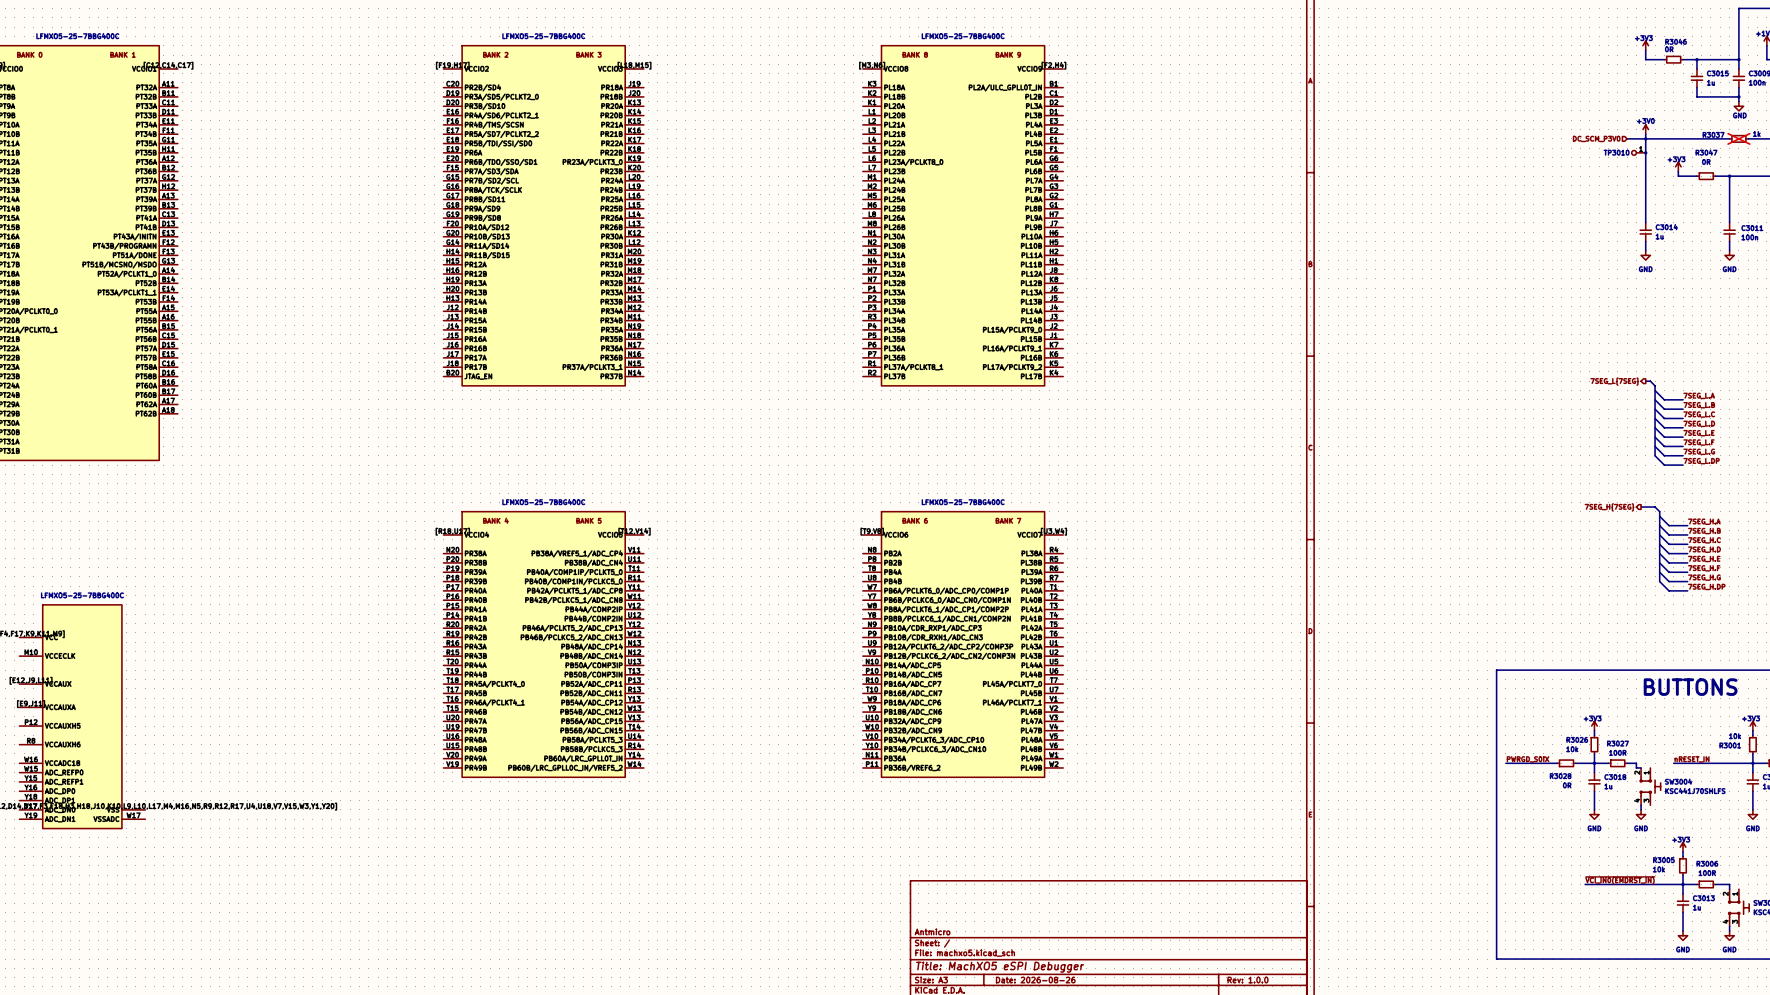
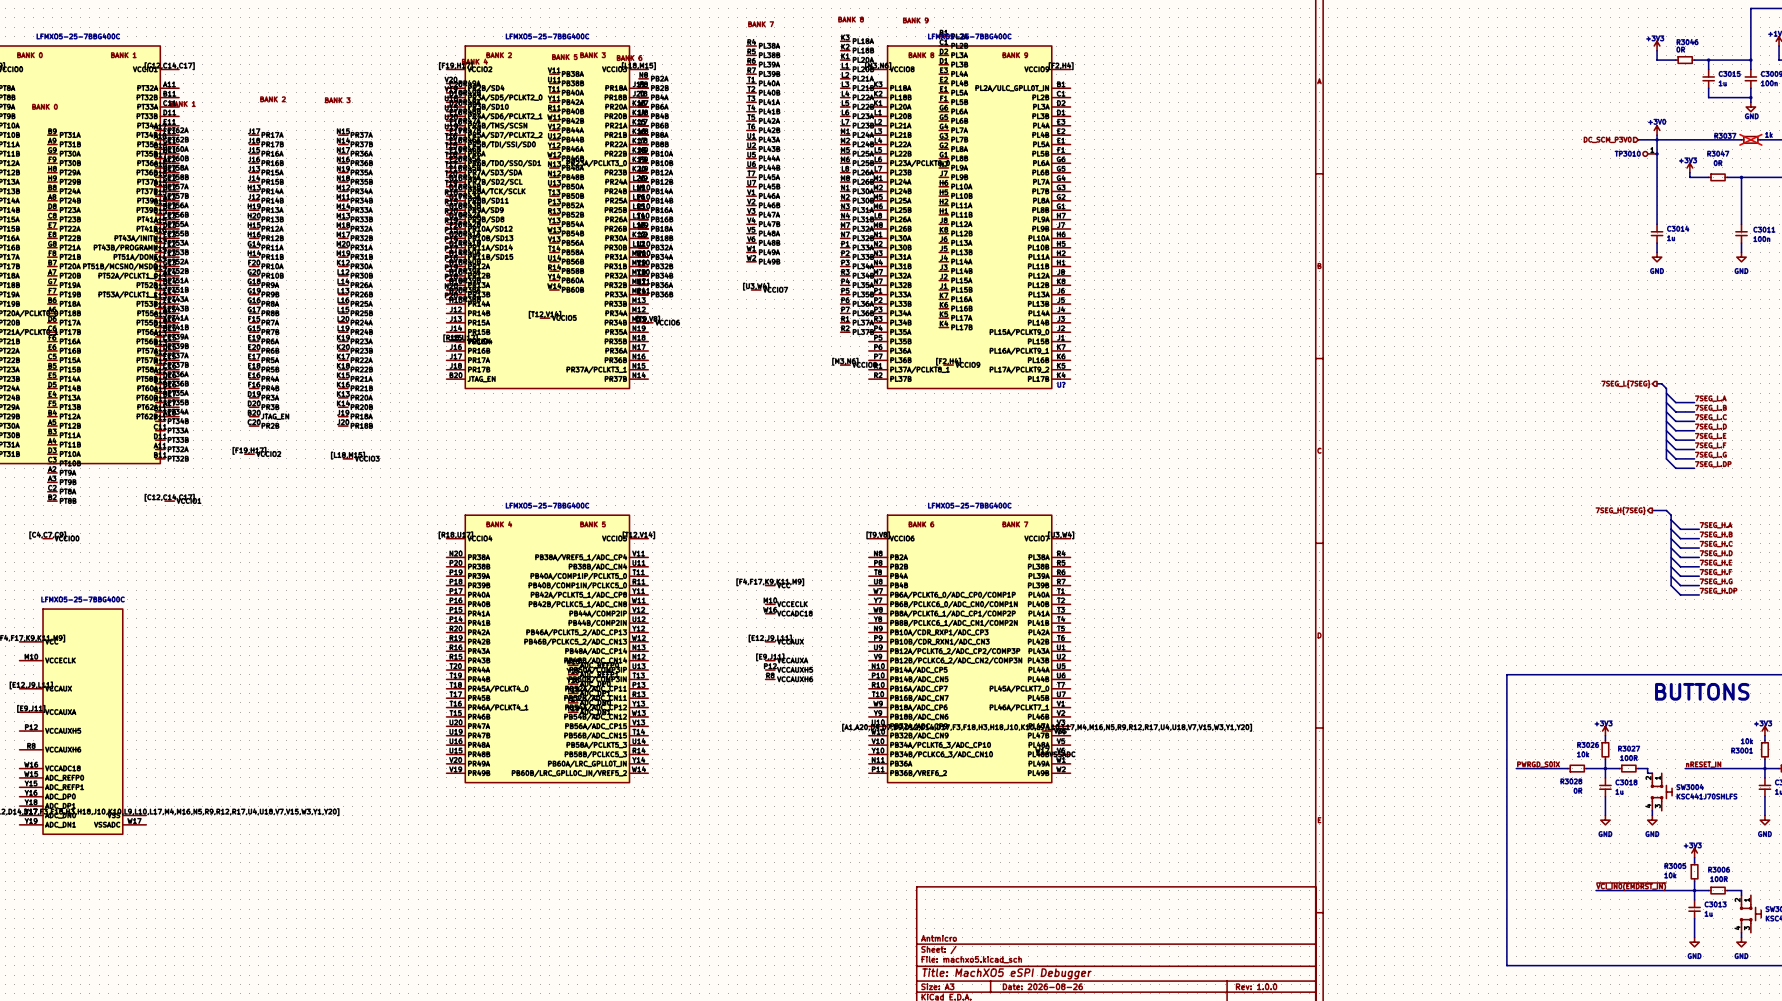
part: none -> (547, 395)

